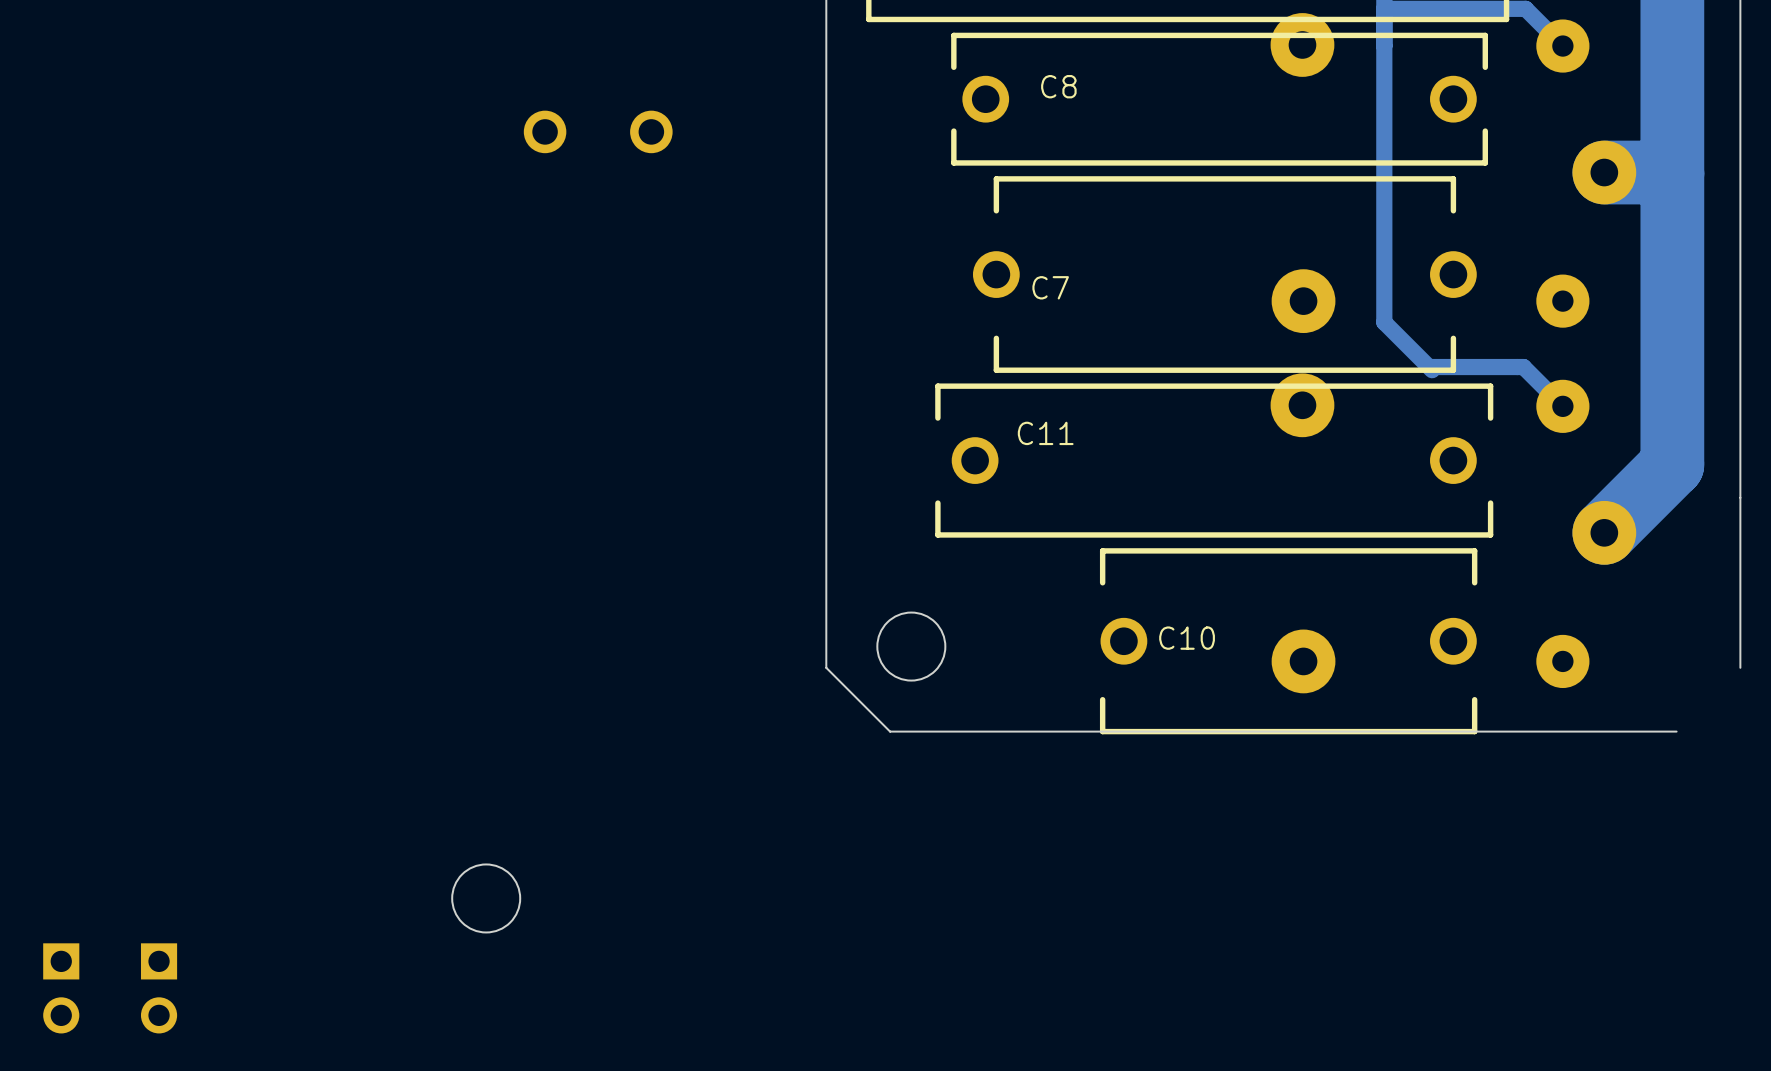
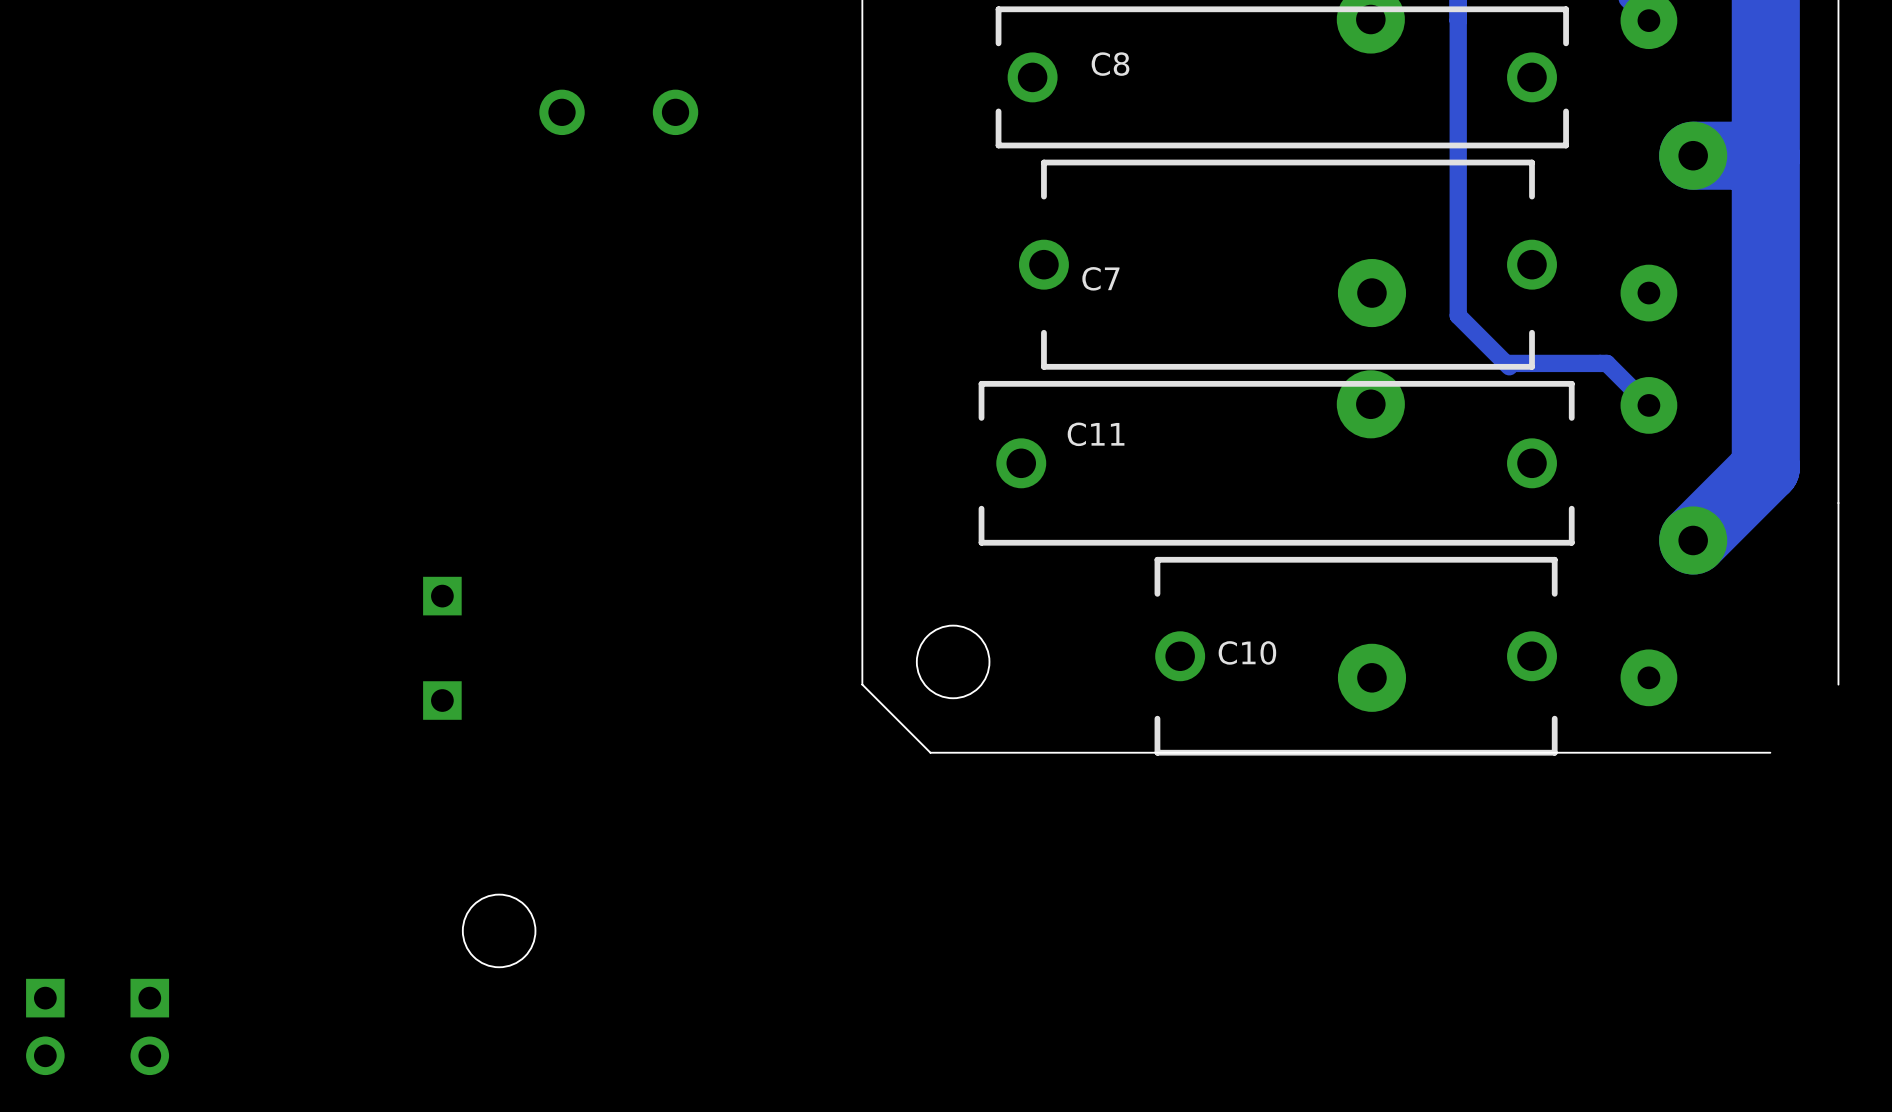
part: none -> (442, 596)
part: none -> (442, 700)

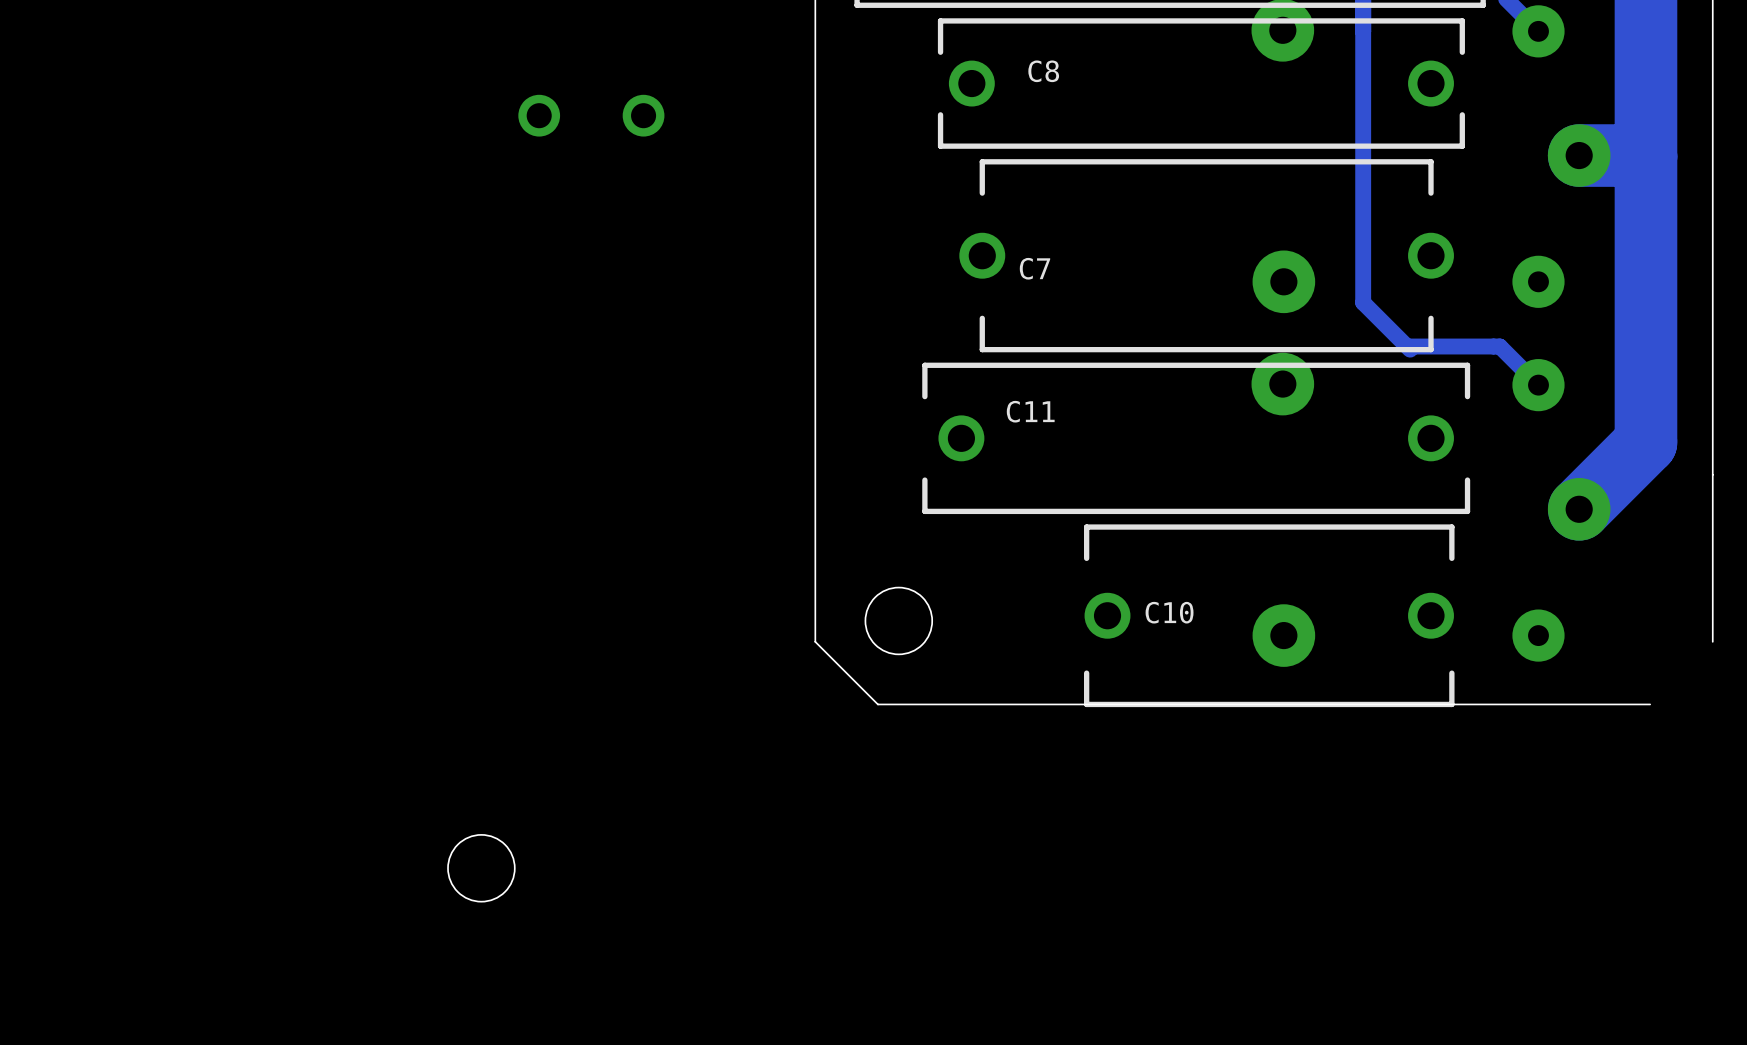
part: (442, 596) -> none
part: (442, 700) -> none
part: (45, 1026) -> none
part: (149, 1026) -> none

